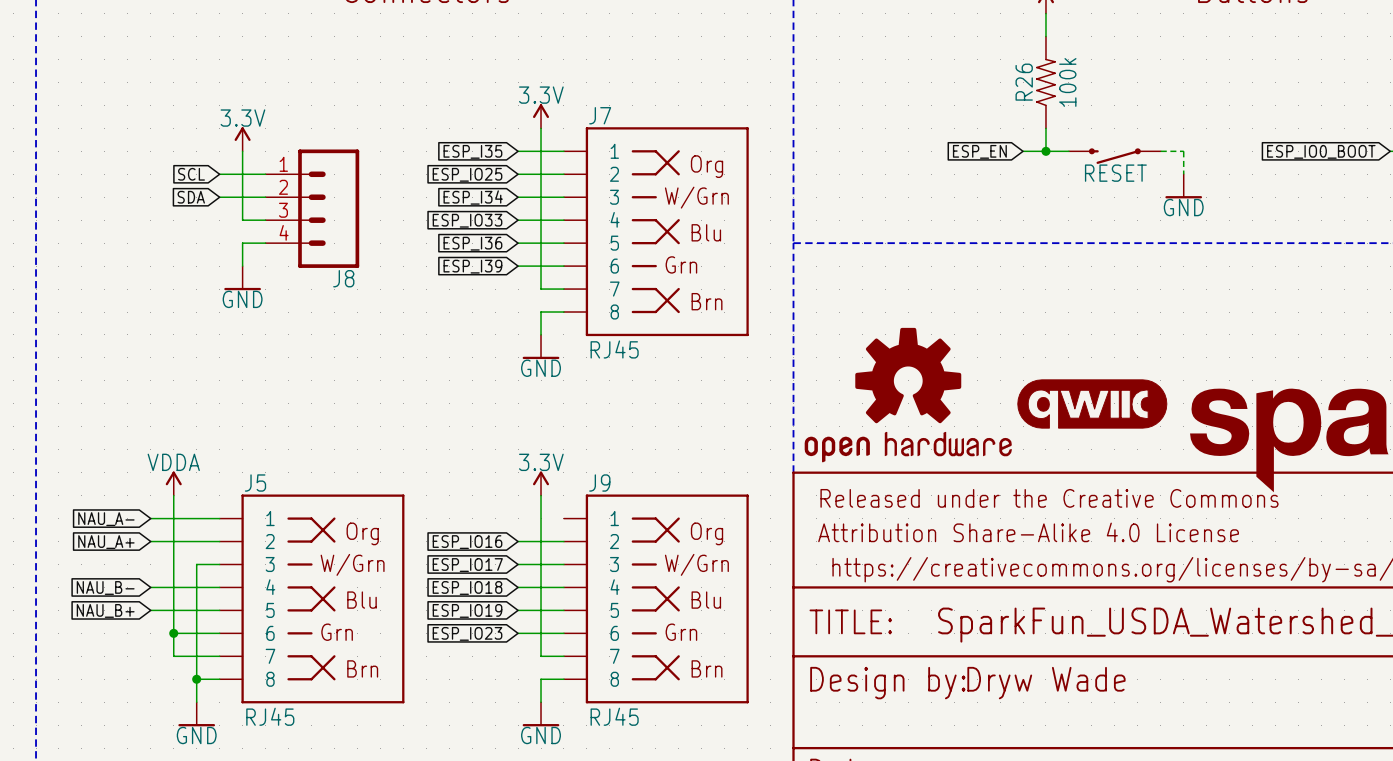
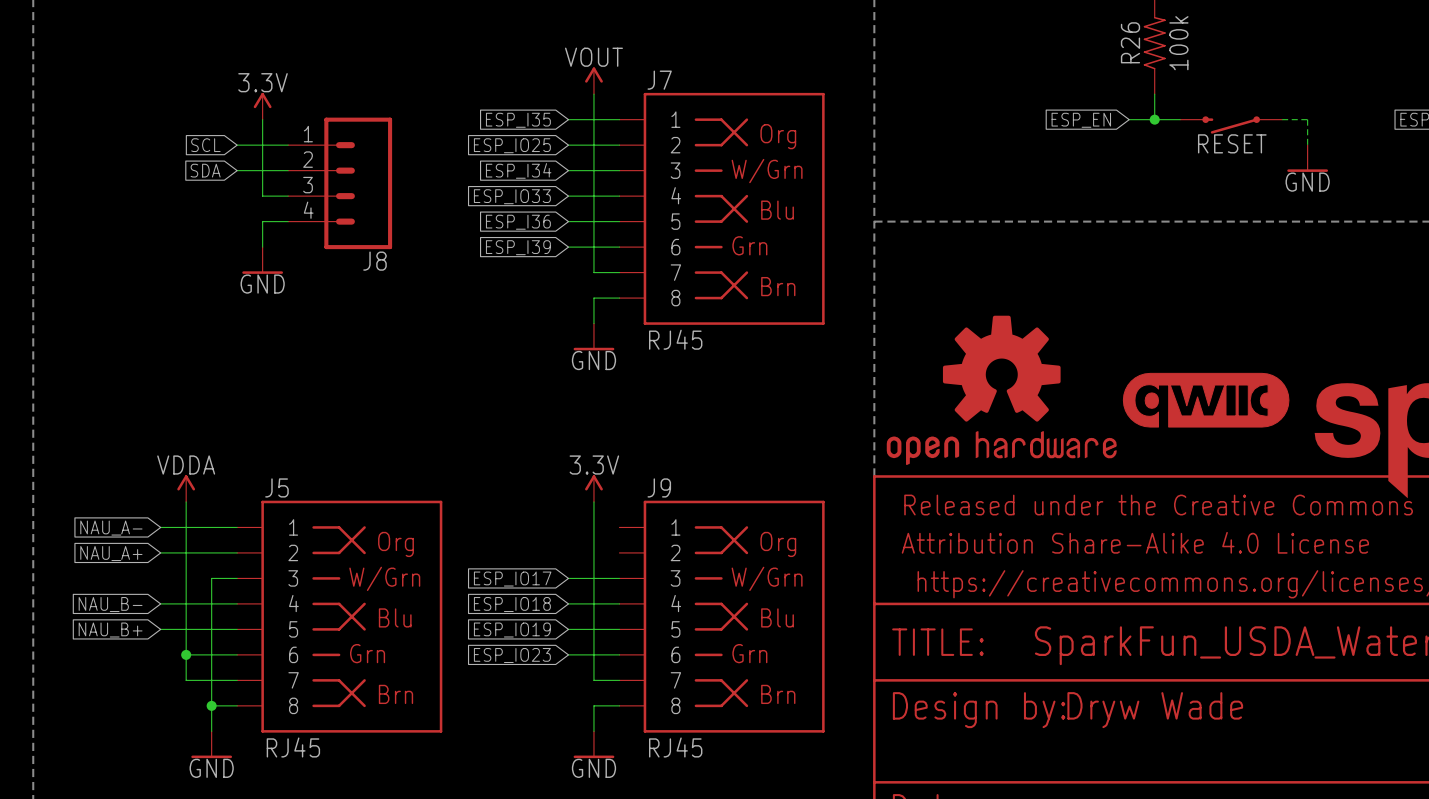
power symbol: 3.3V (541, 116) -> VOUT (593, 80)
wire: (518, 541) (563, 541) -> none
global label: ESP_IO16 (467, 542) -> none

